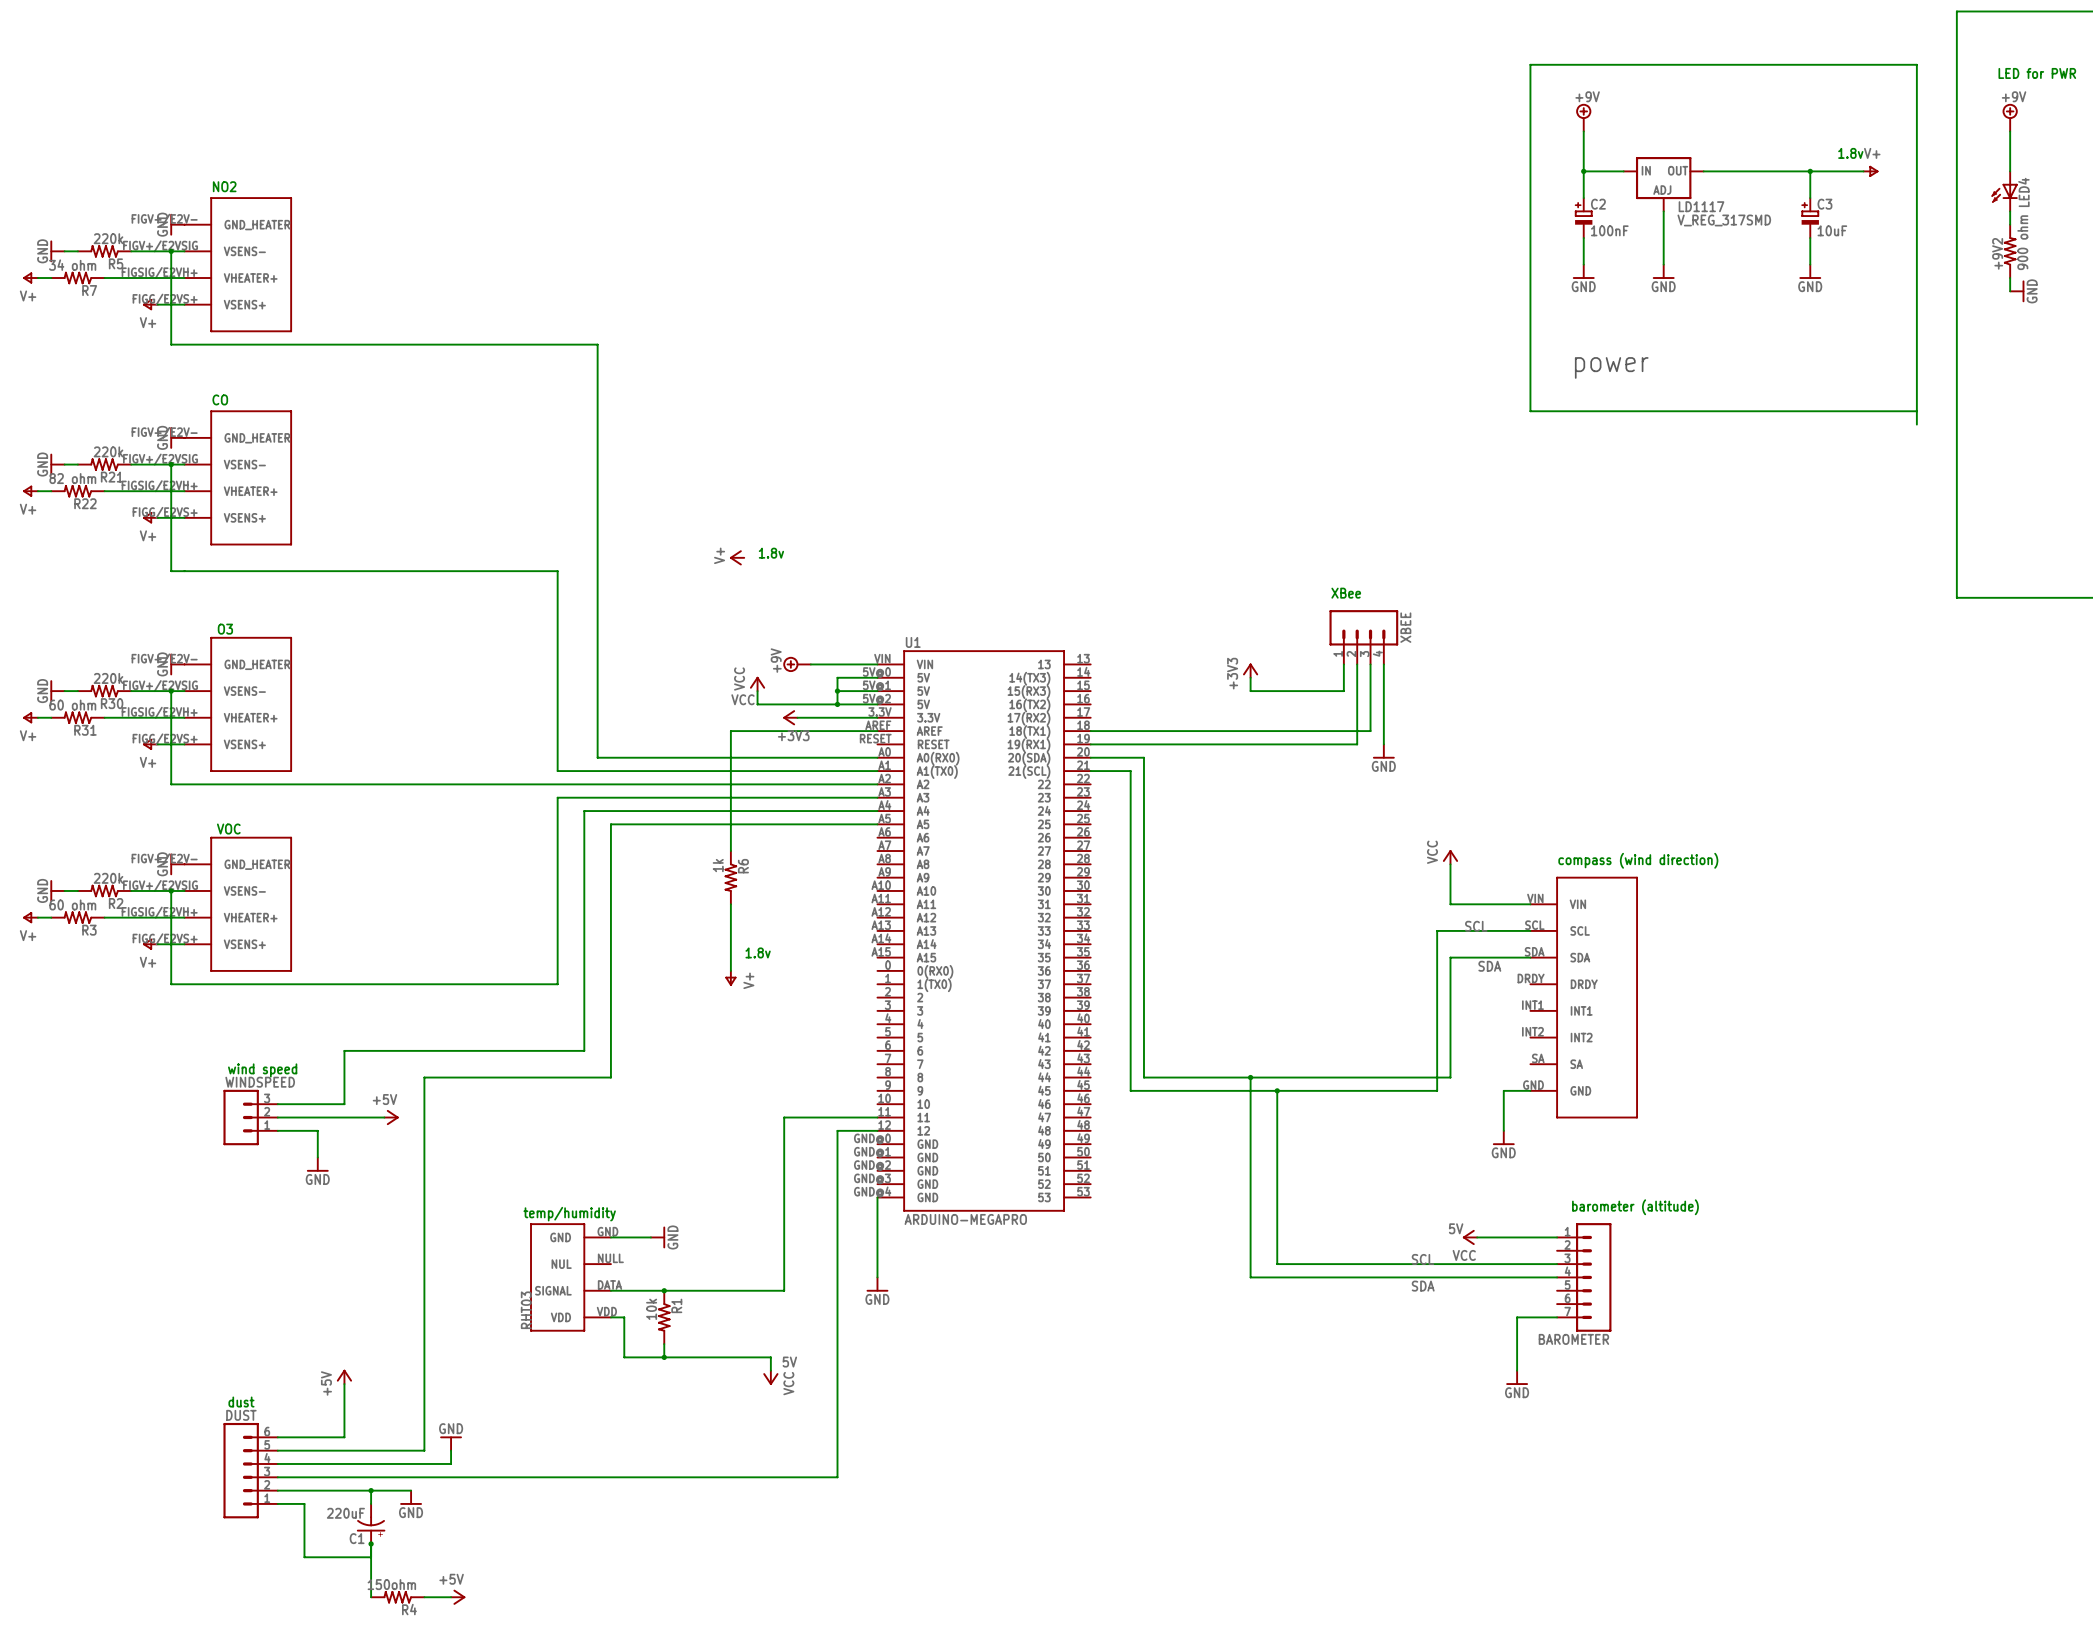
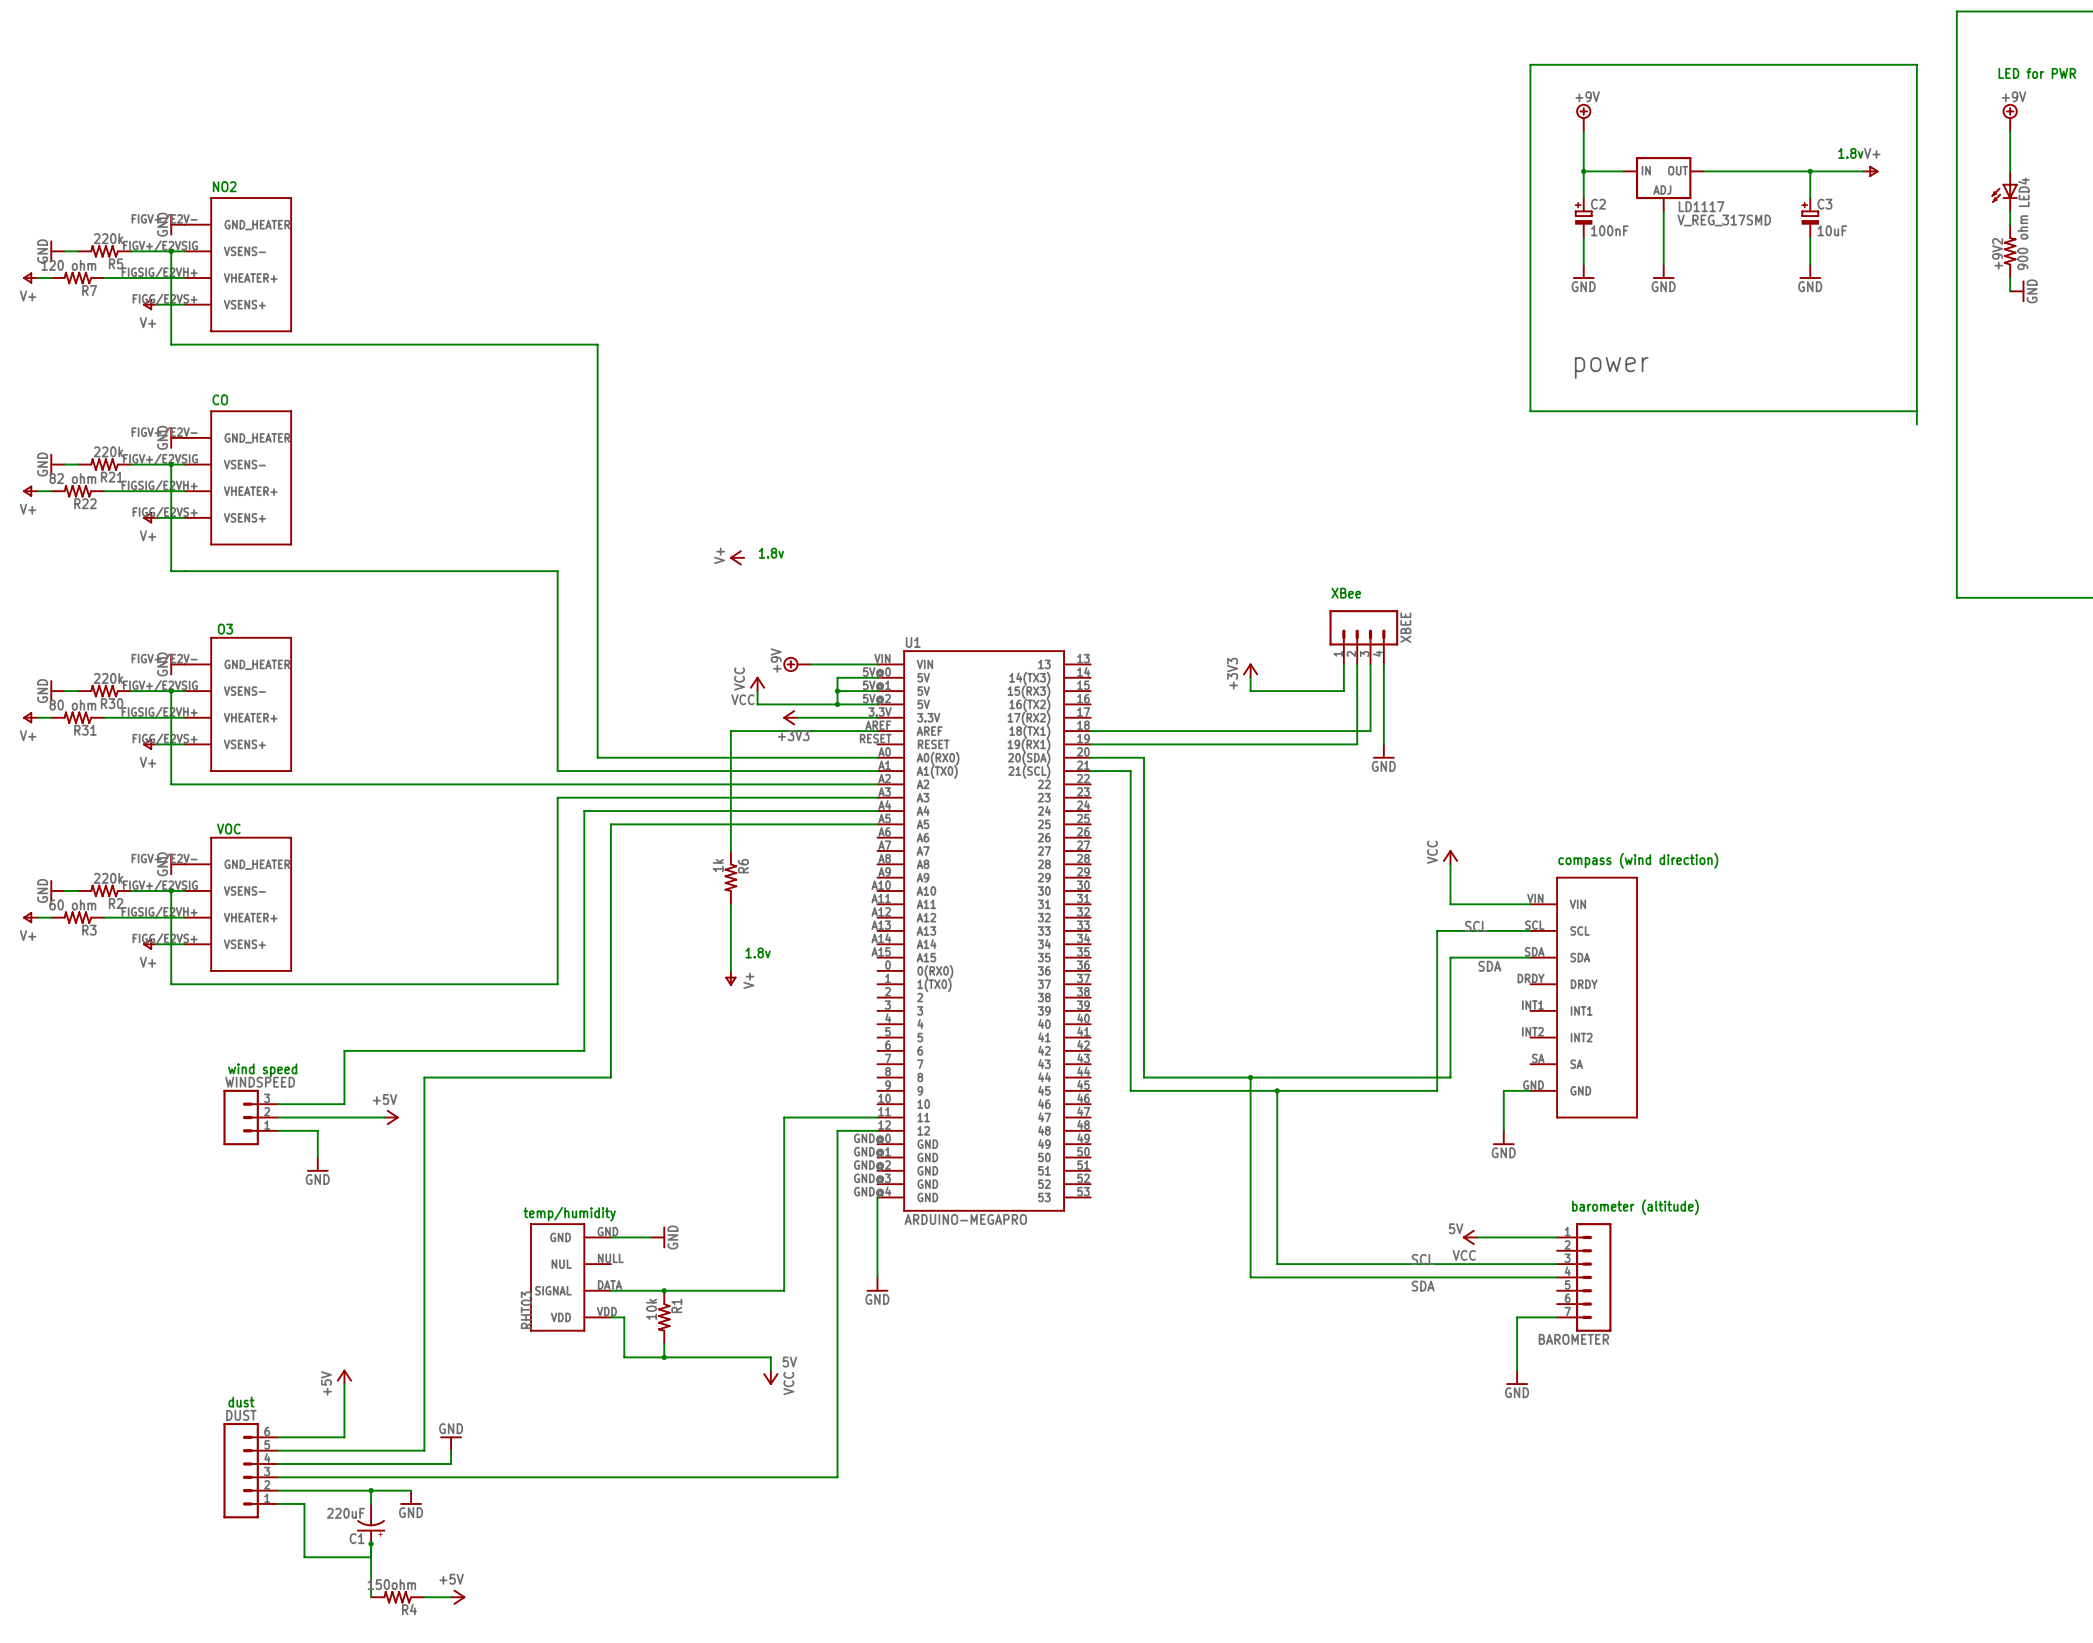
R7 value: 34 ohm (72, 265) -> 120 ohm (68, 265)
R31 value: 60 ohm (72, 705) -> 80 ohm (72, 705)

